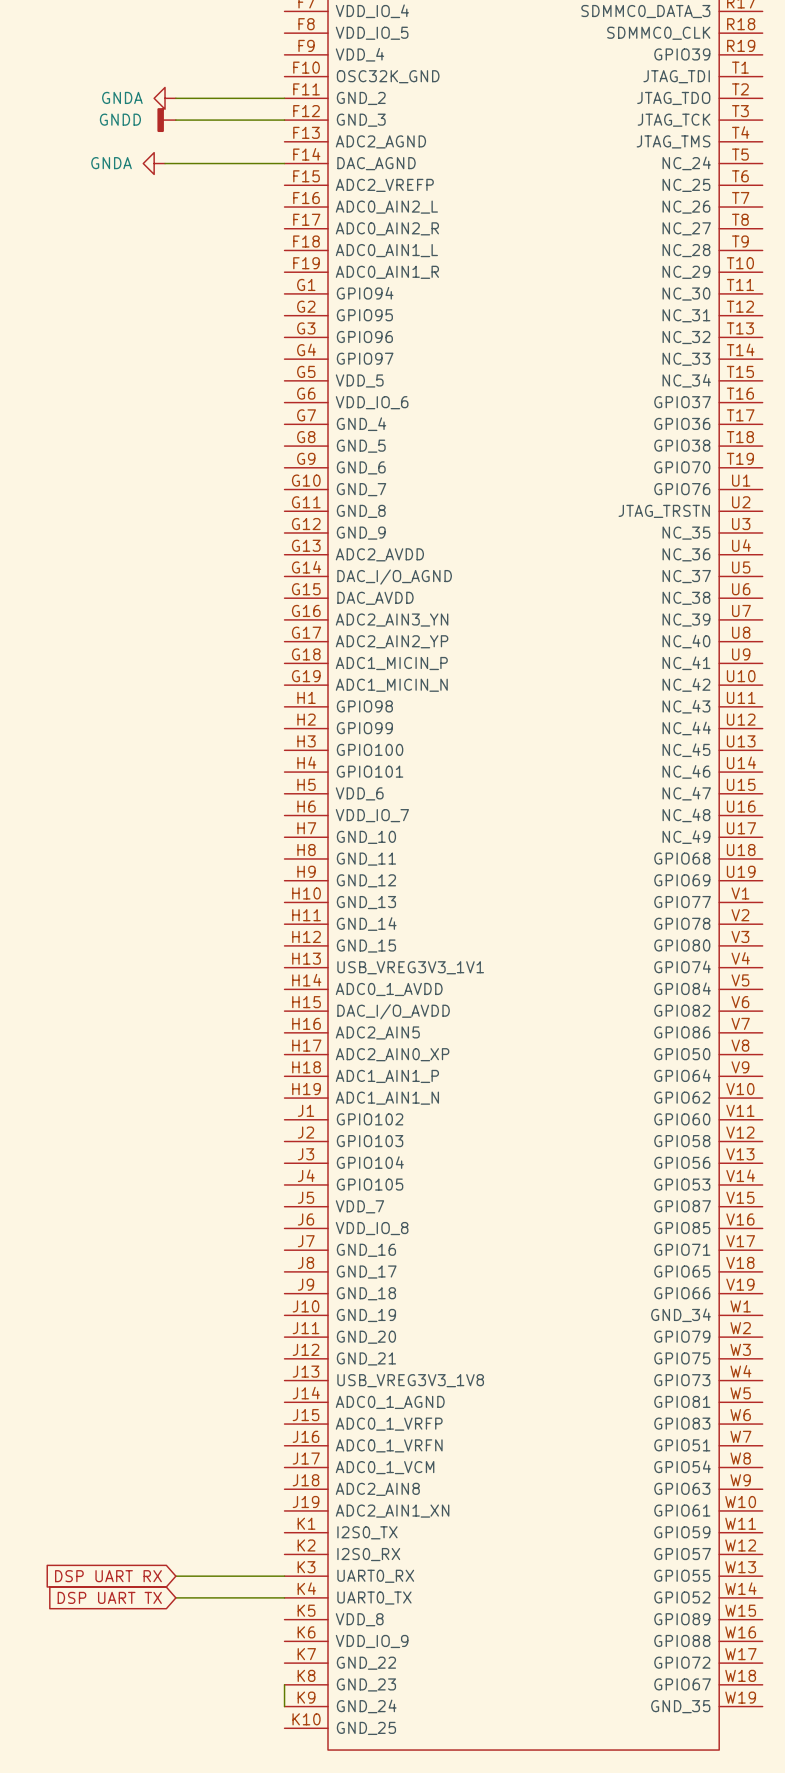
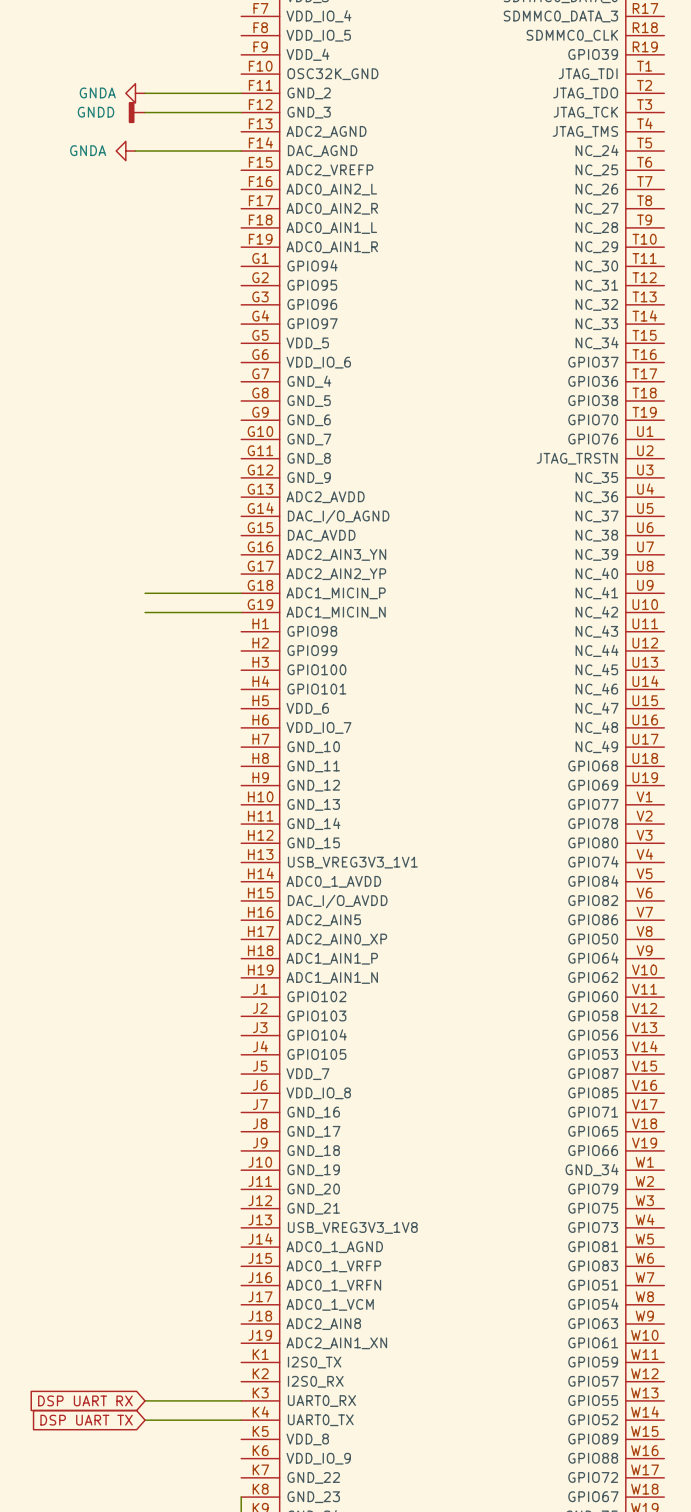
wire: none -> (145, 593) (241, 593)
wire: none -> (145, 612) (241, 612)

